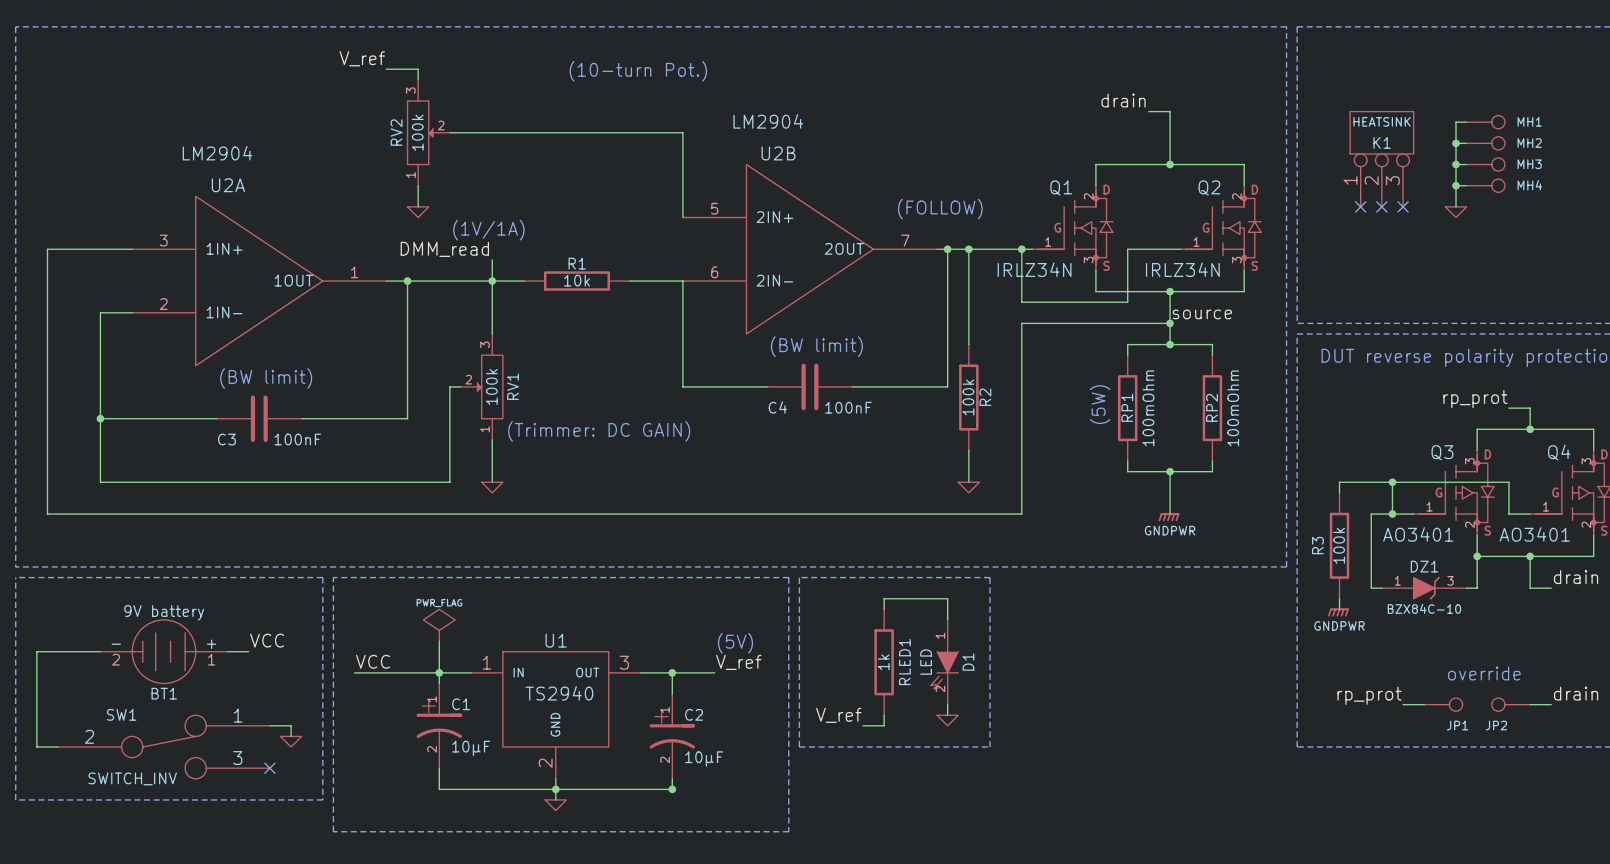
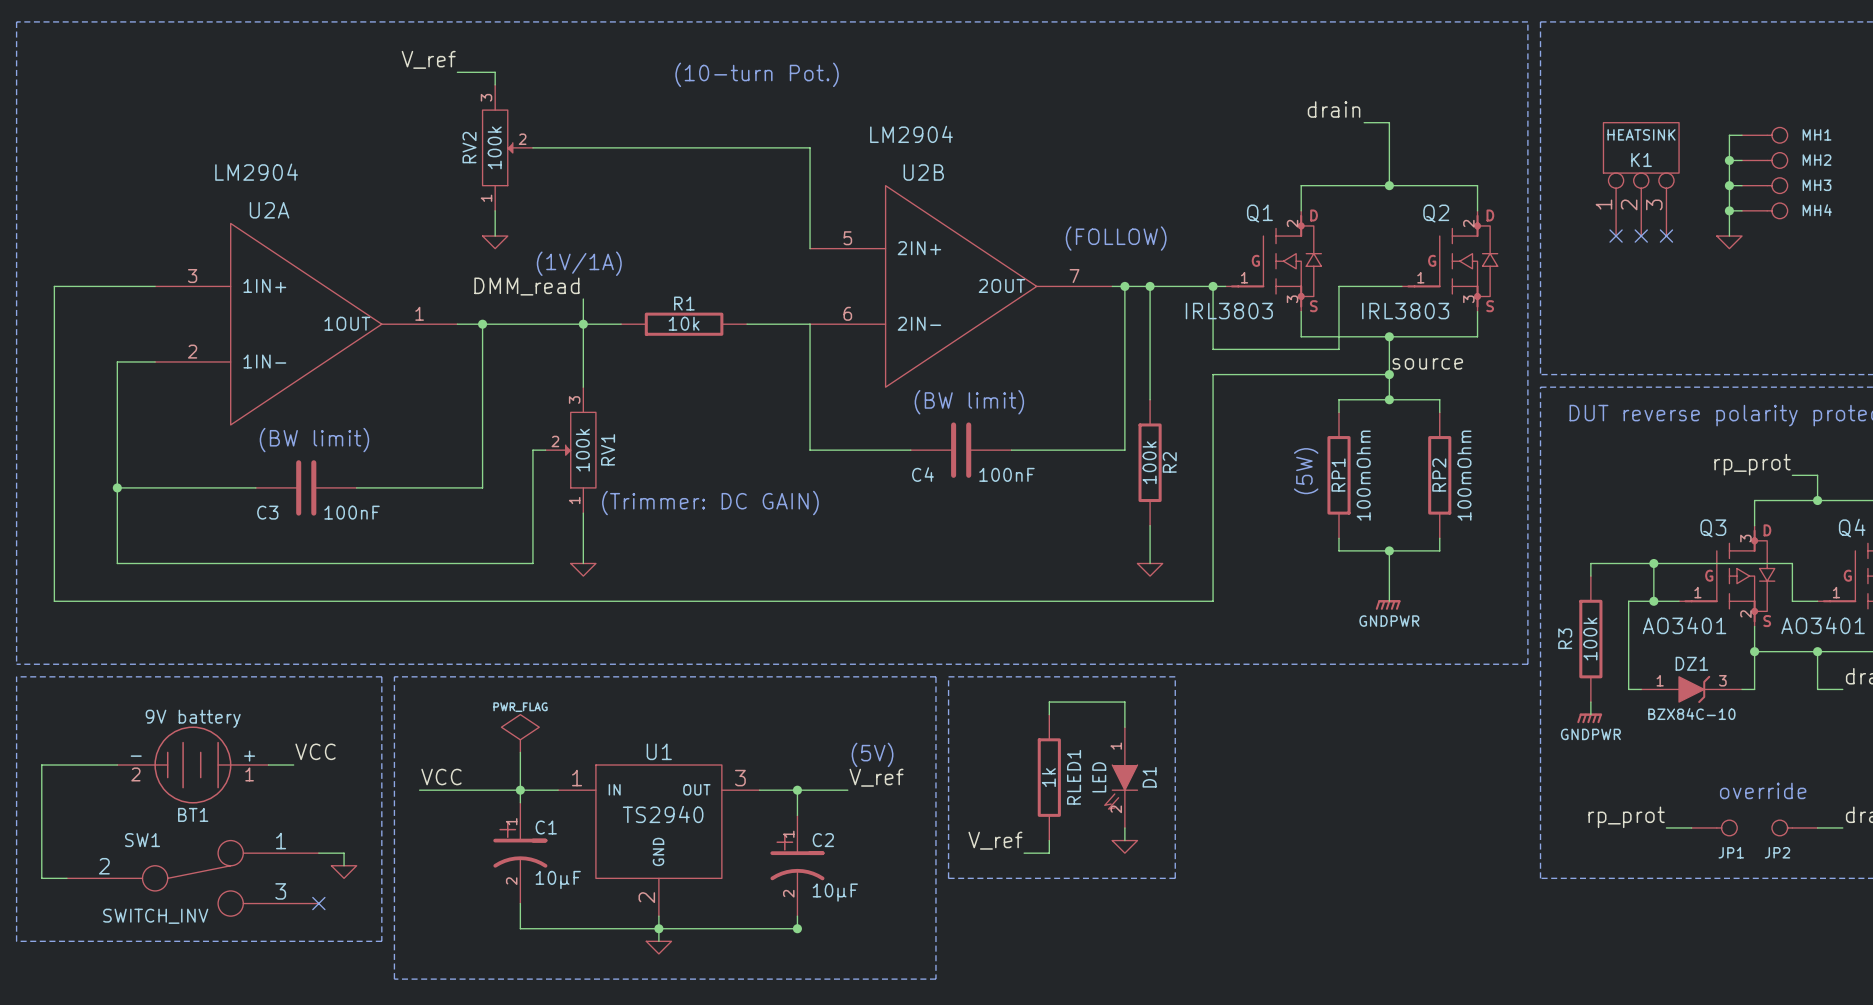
Q1 value: IRLZ34N (1034, 269) -> IRL3803 (1229, 311)
Q2 value: IRLZ34N (1182, 269) -> IRL3803 (1405, 311)

